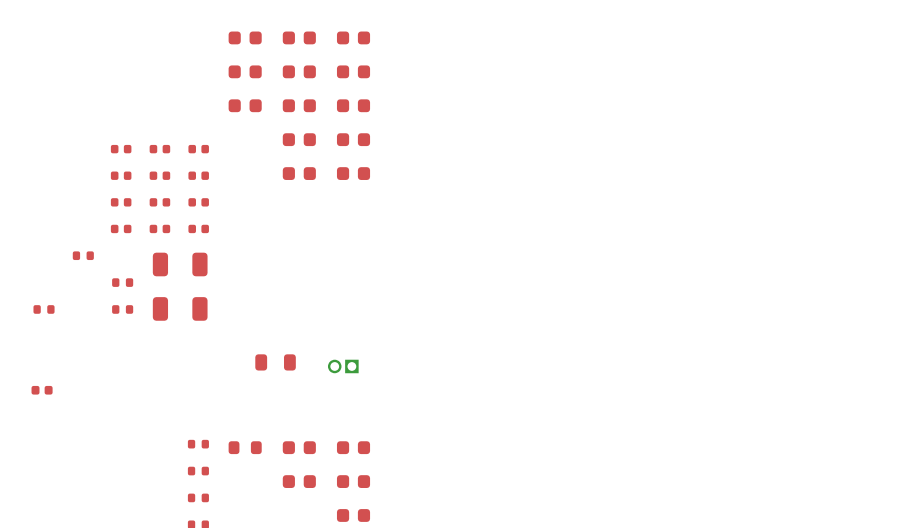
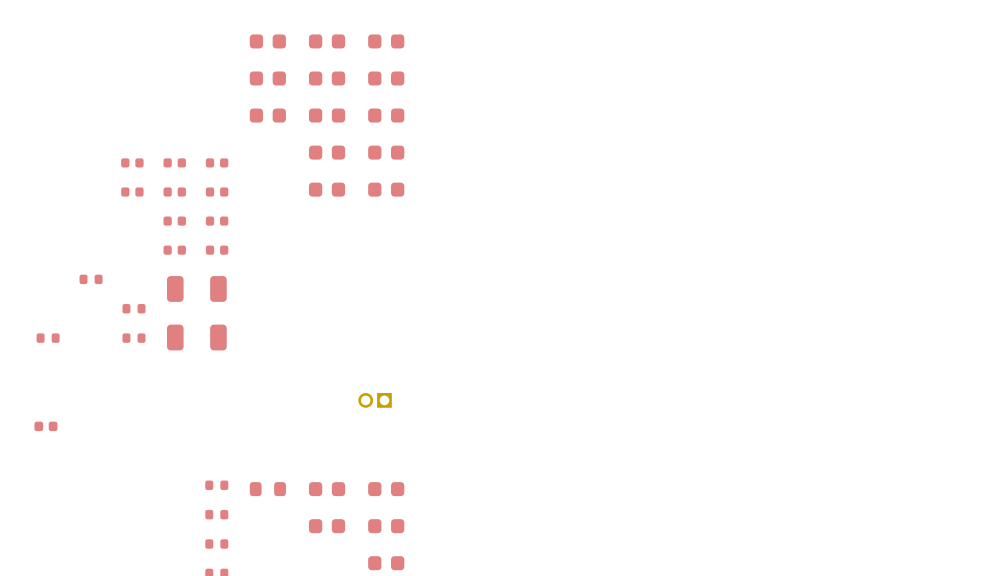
part: (121, 202) -> none
part: (121, 228) -> none
part: (275, 362) -> none

